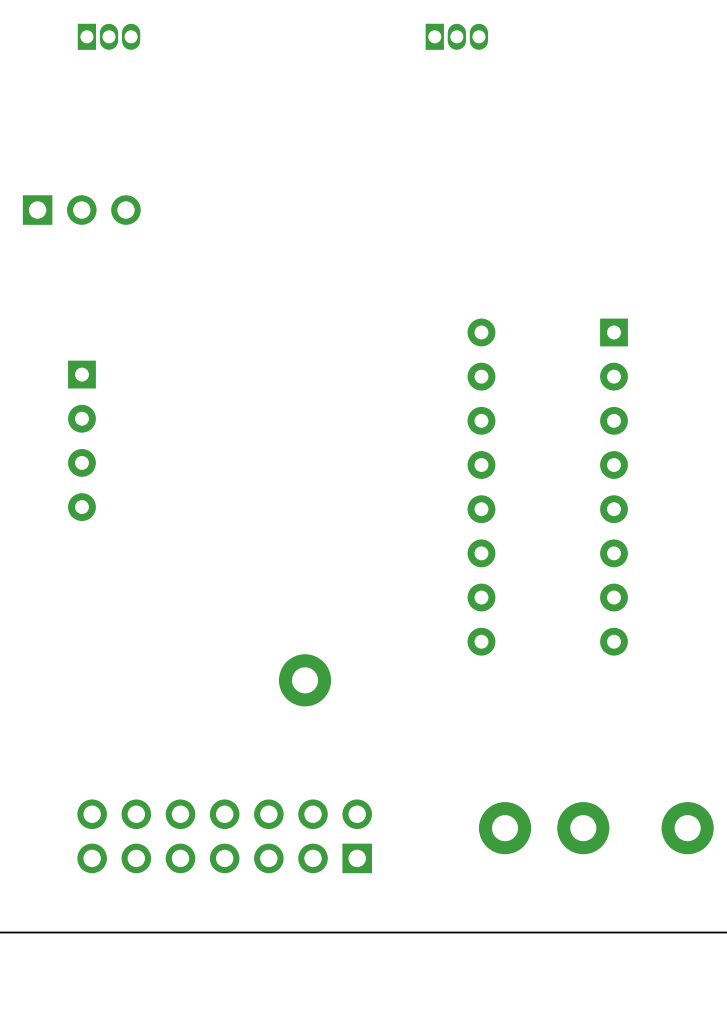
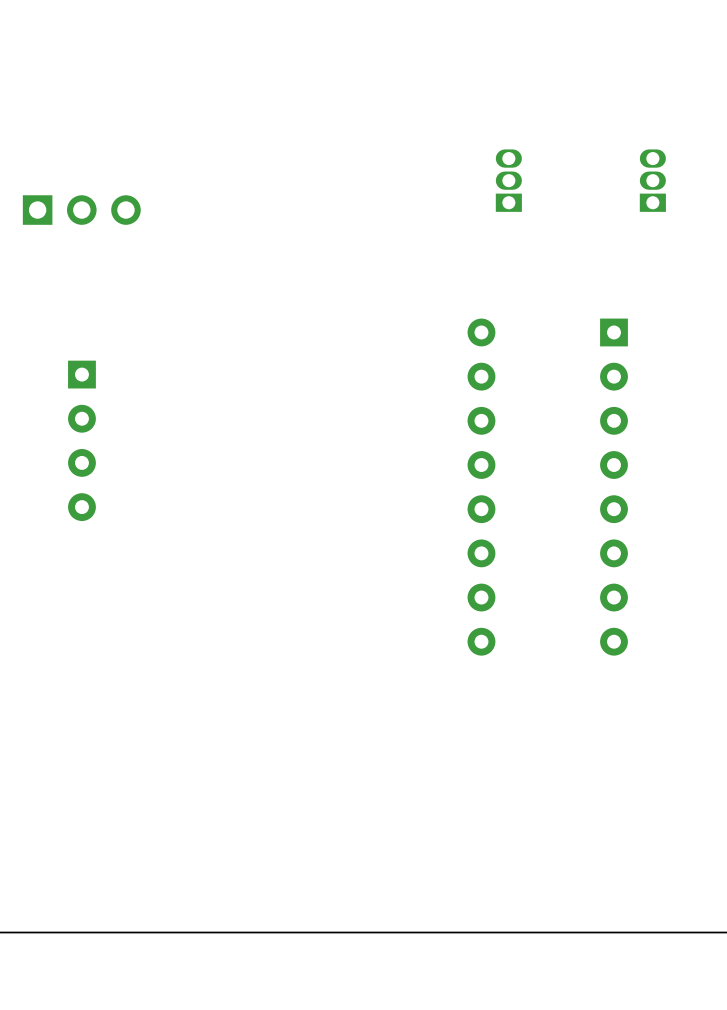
part: (109, 36) -> none
part: (456, 36) -> none
part: none -> (508, 180)
part: none -> (652, 180)
part: (305, 680) -> none
part: (505, 828) -> none
part: (583, 828) -> none
part: (687, 828) -> none
part: (224, 836) -> none

